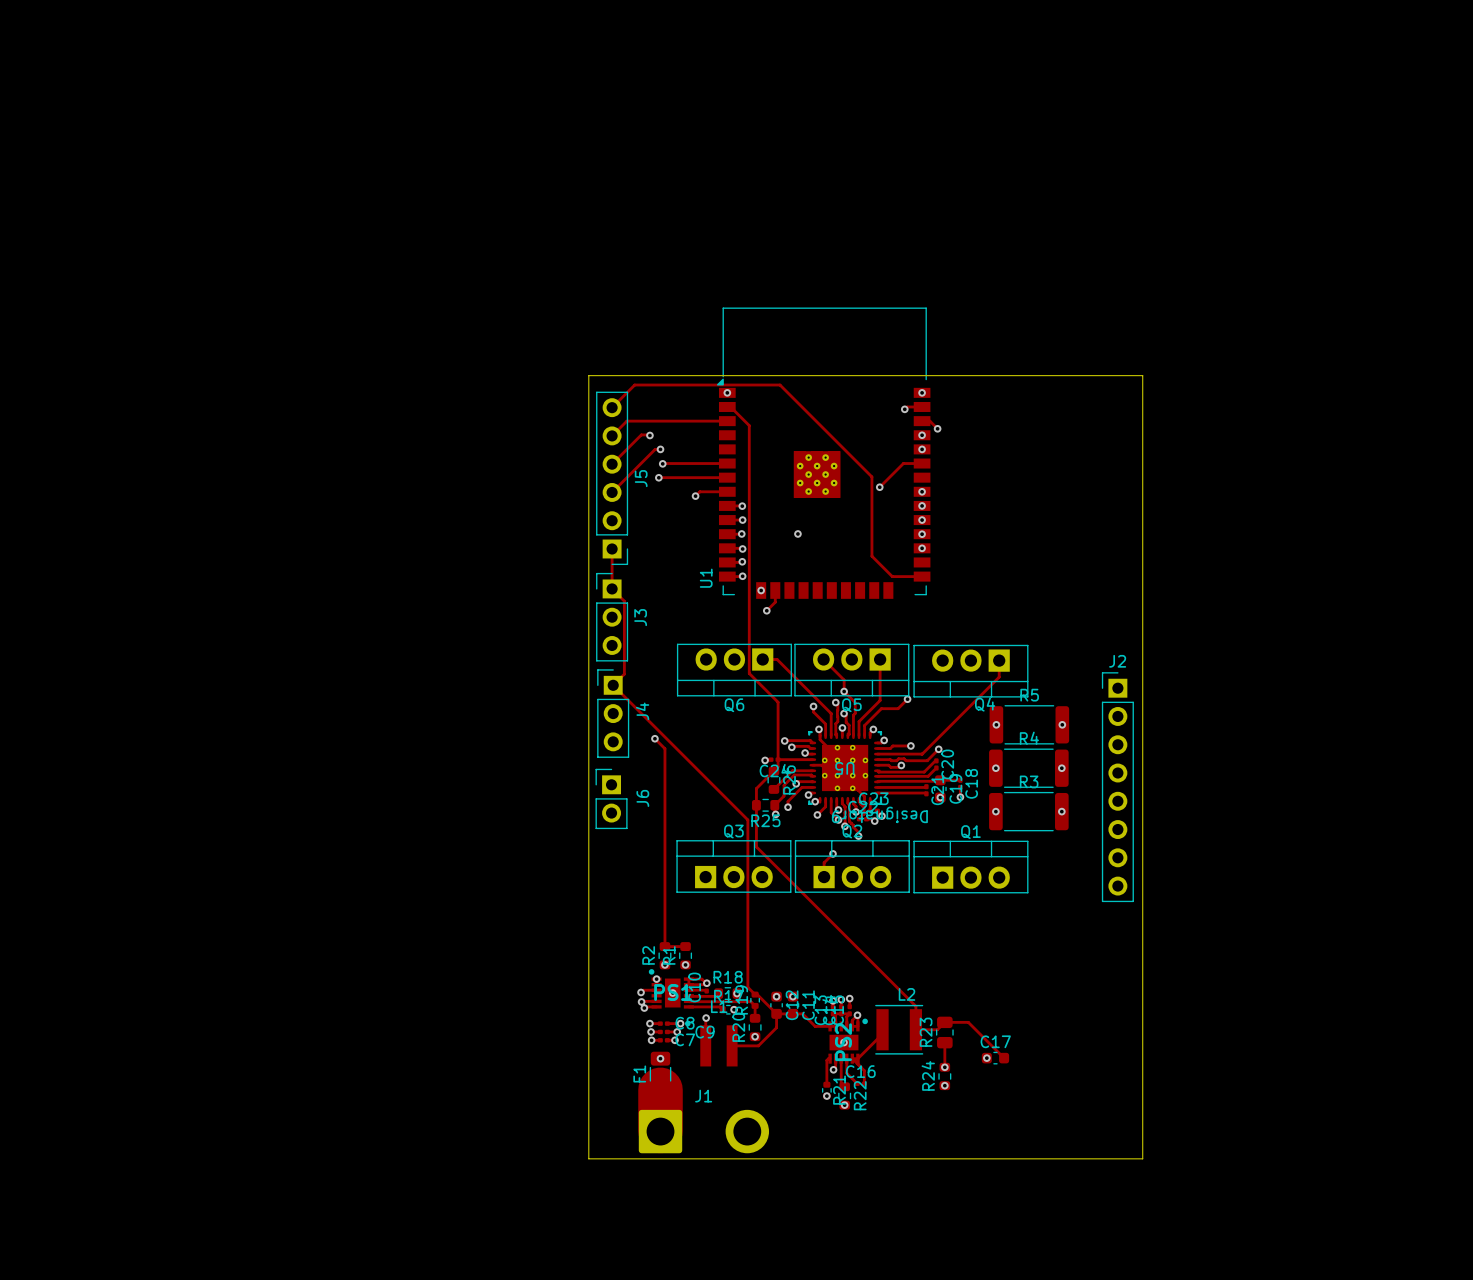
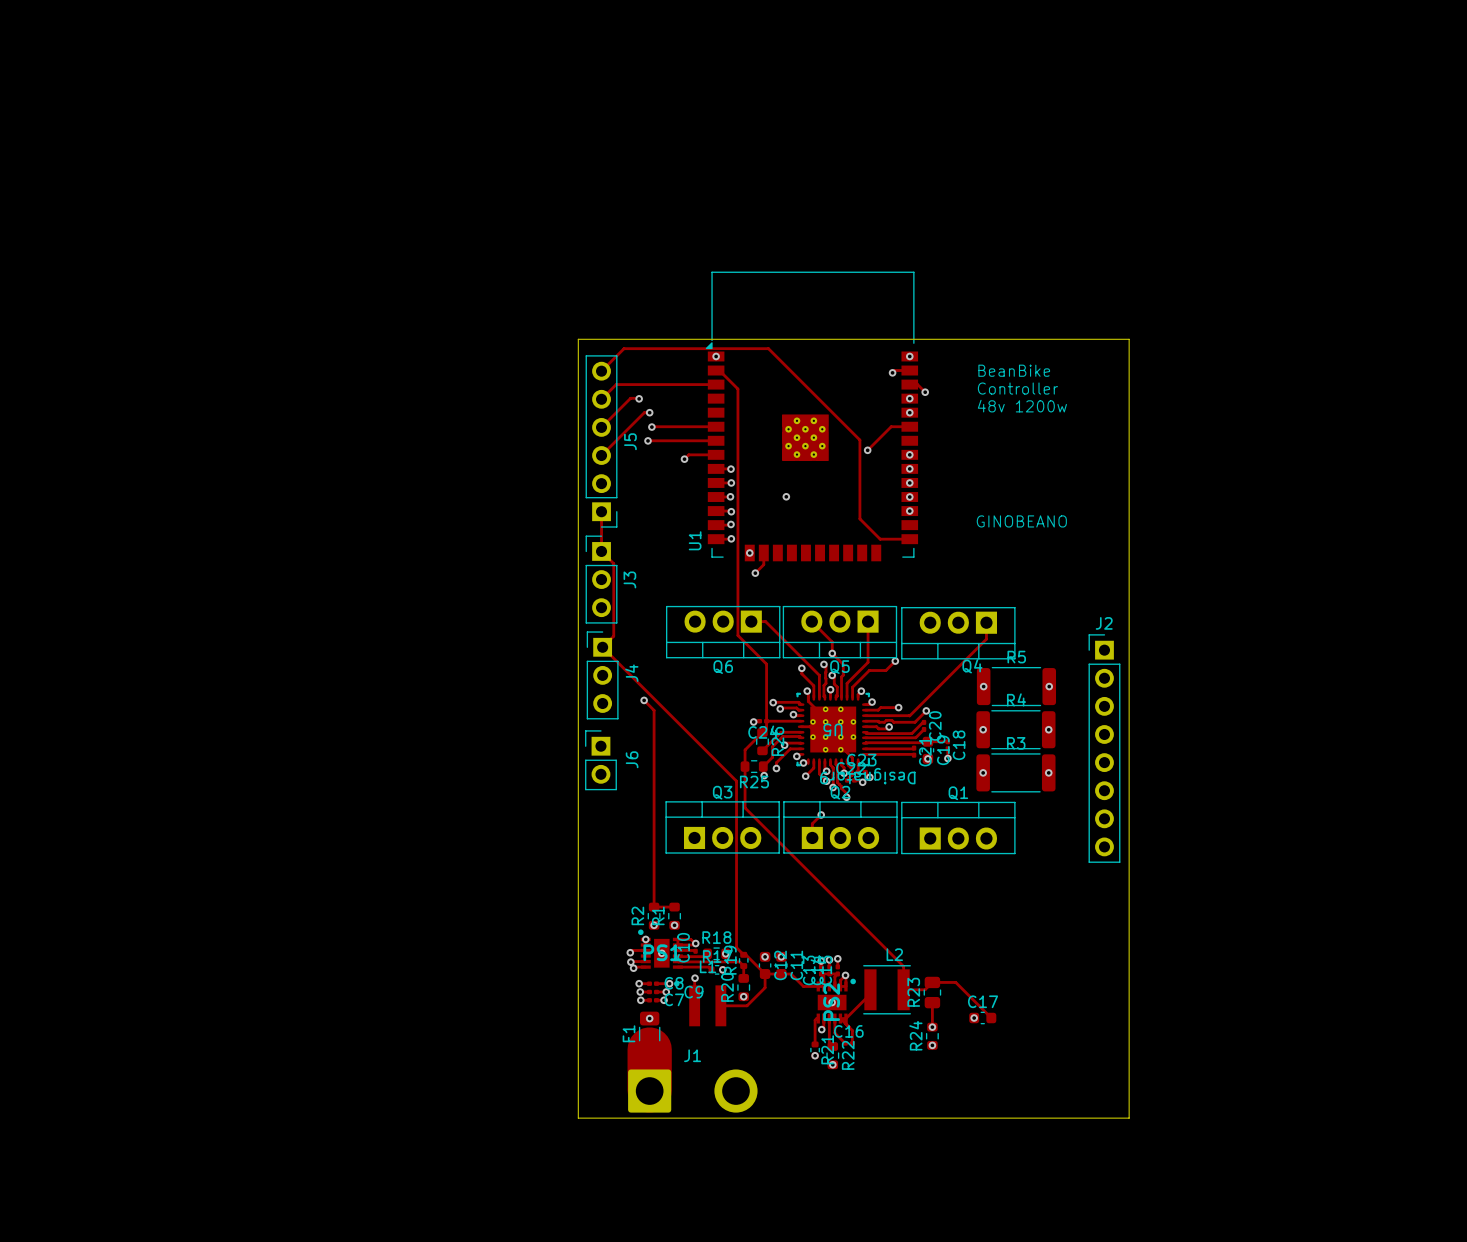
text: none -> BeanBike (1014, 370)
text: none -> Controller (1017, 388)
text: none -> 48v 1200w (1022, 406)
text: none -> GINOBEANO (1021, 521)

